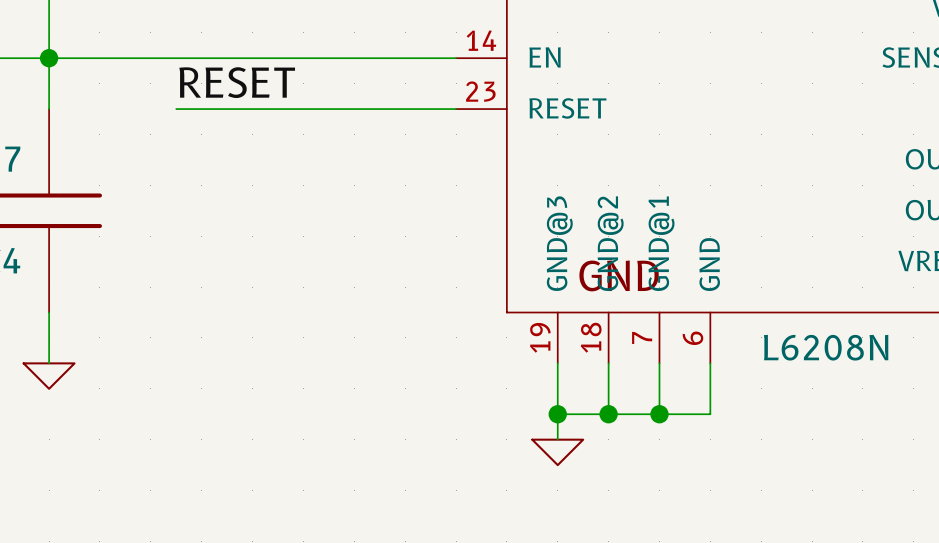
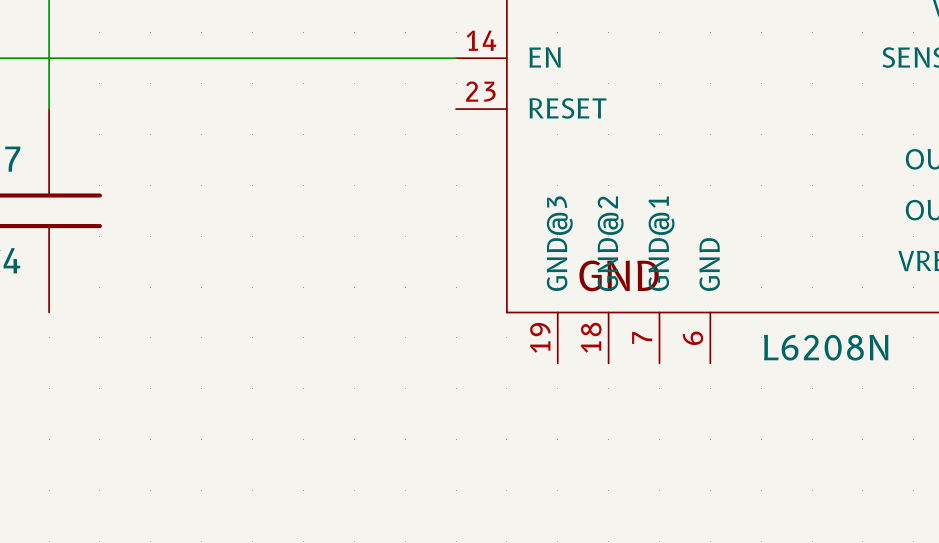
junction: (49, 58) -> none
label: RESET (237, 82) -> none
wire: (176, 109) (456, 109) -> none
wire: (49, 312) (49, 363) -> none
wire: (557, 363) (557, 439) -> none
wire: (608, 363) (608, 414) -> none
wire: (659, 363) (659, 414) -> none
wire: (710, 363) (710, 414) (557, 414) -> none
power symbol: (49, 376) -> none
junction: (557, 414) -> none
junction: (608, 414) -> none
junction: (659, 414) -> none
power symbol: (557, 452) -> none

